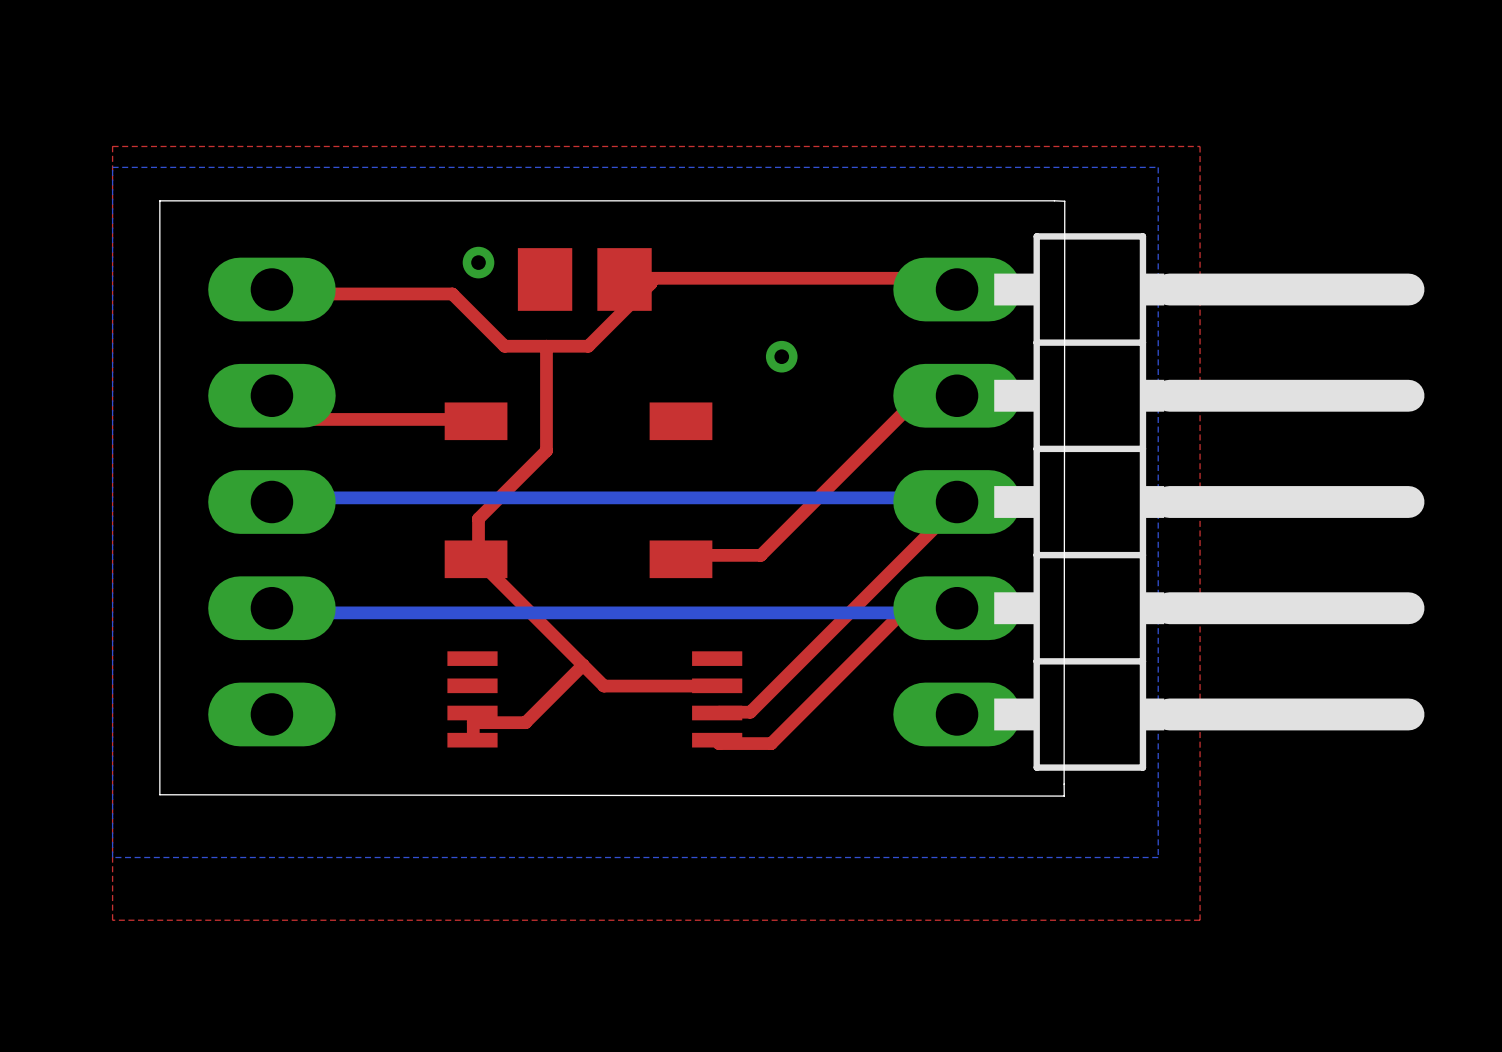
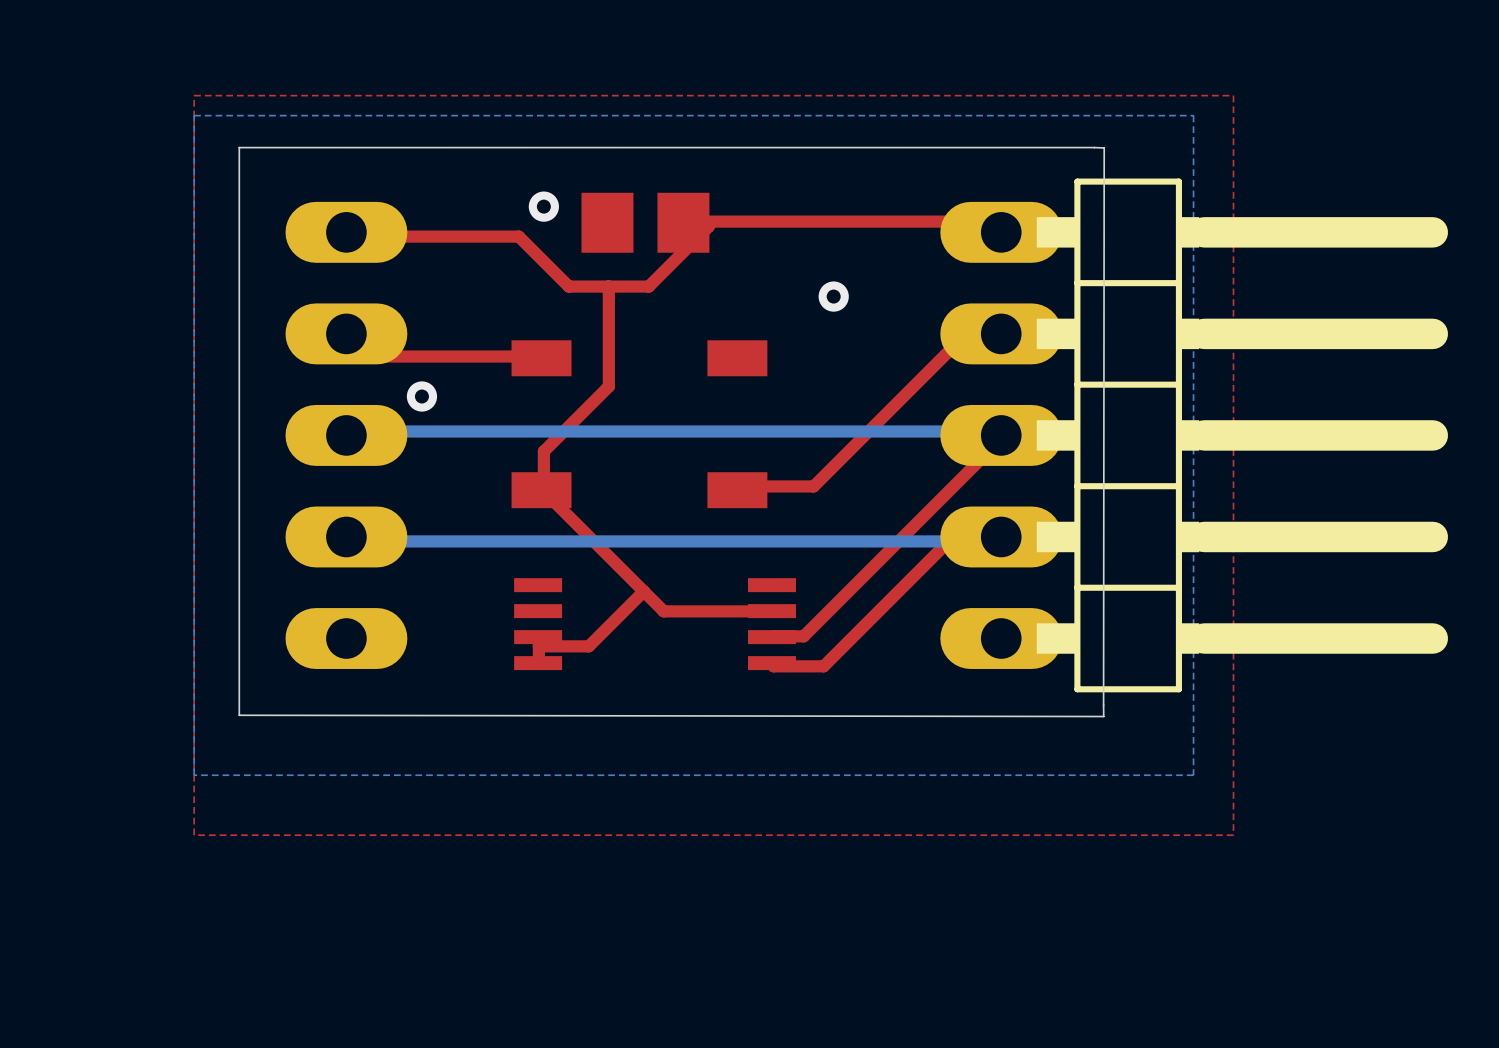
via: none -> (421, 396)

